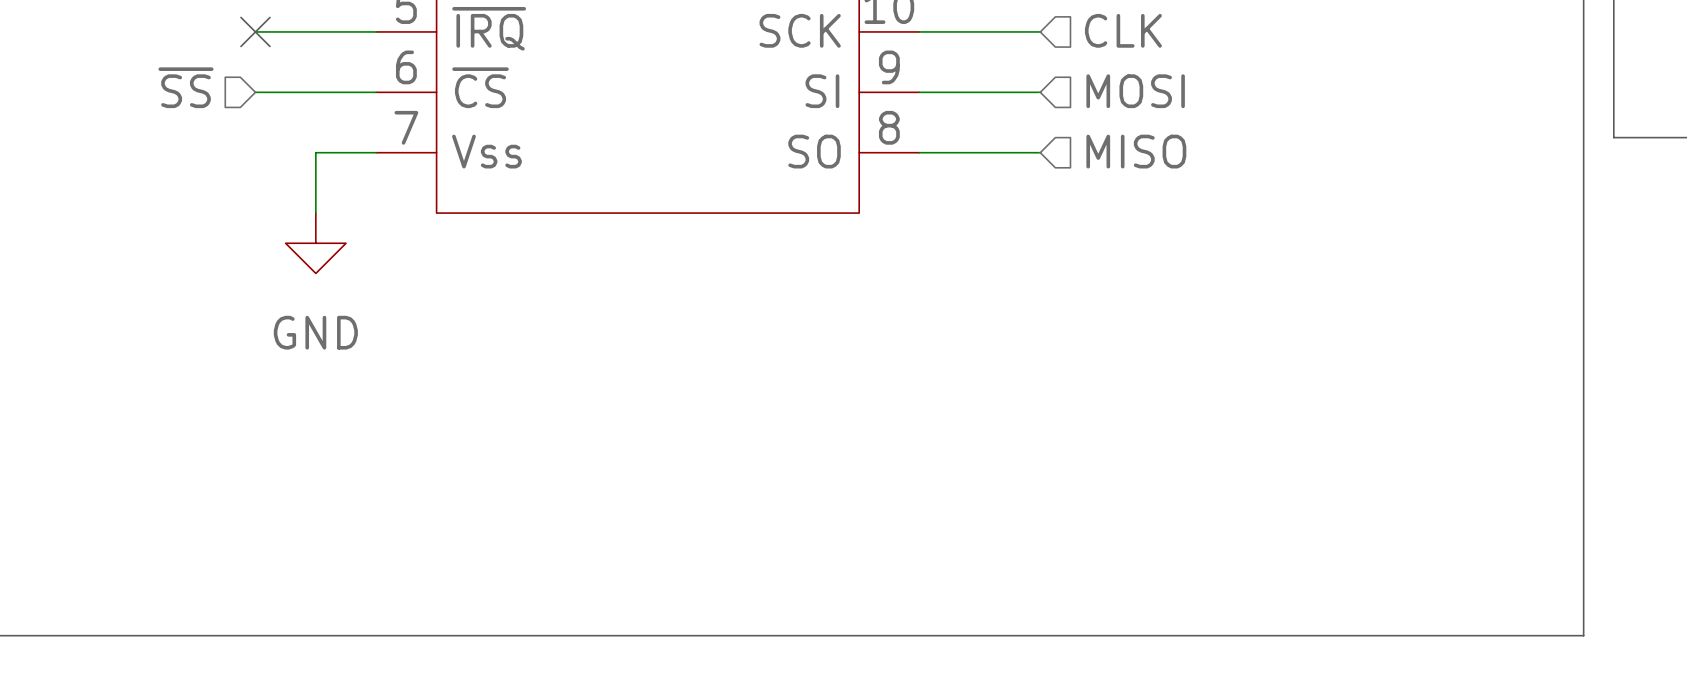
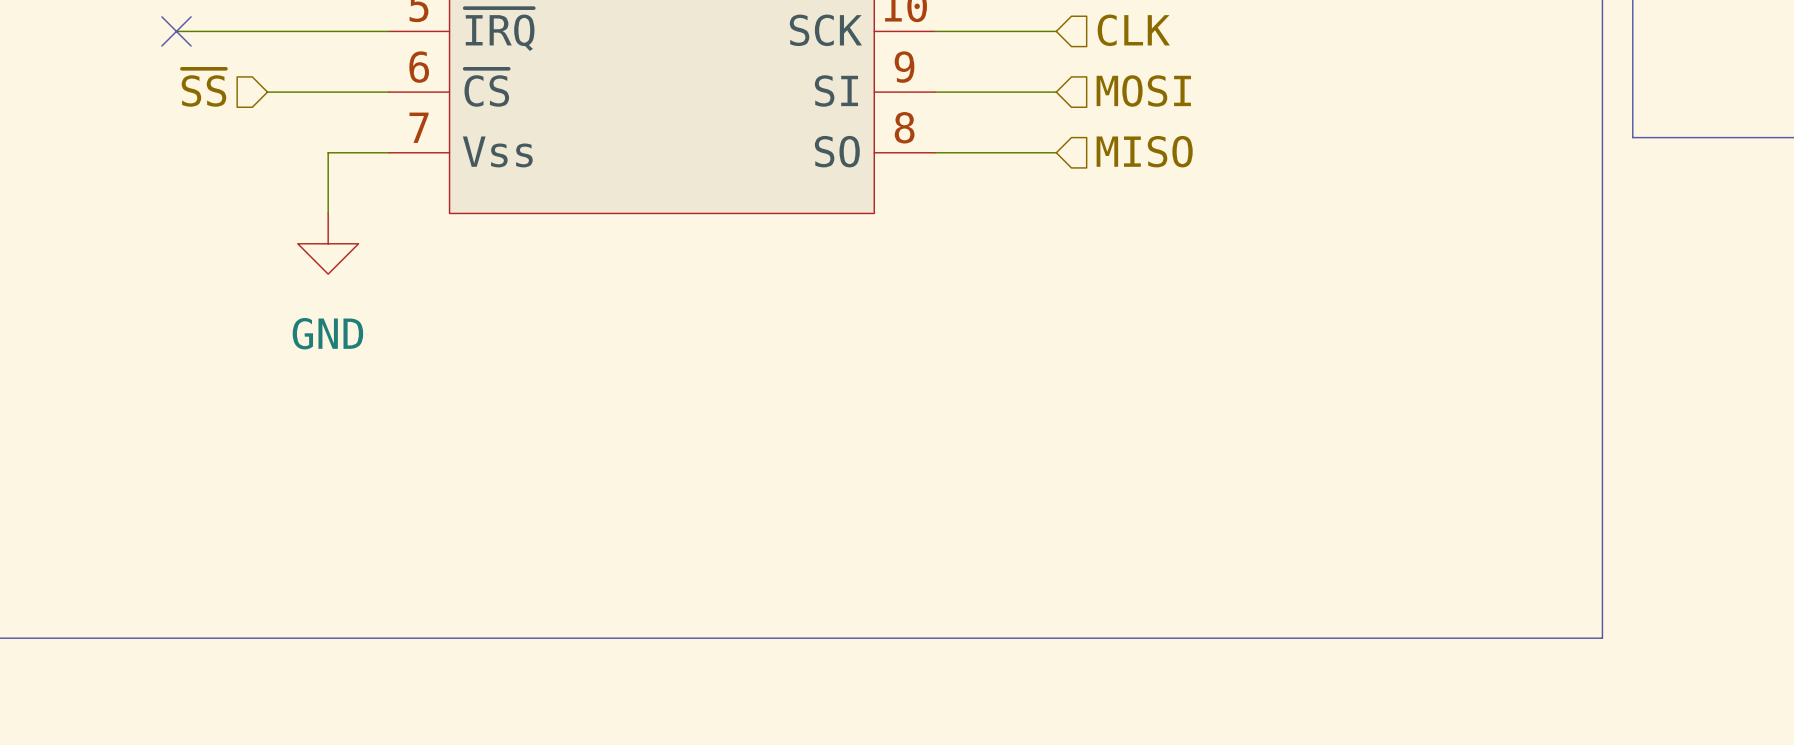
wire: none -> (176, 31) (267, 31)
no-connect mark: none -> (176, 31)
no-connect mark: (255, 31) -> none

